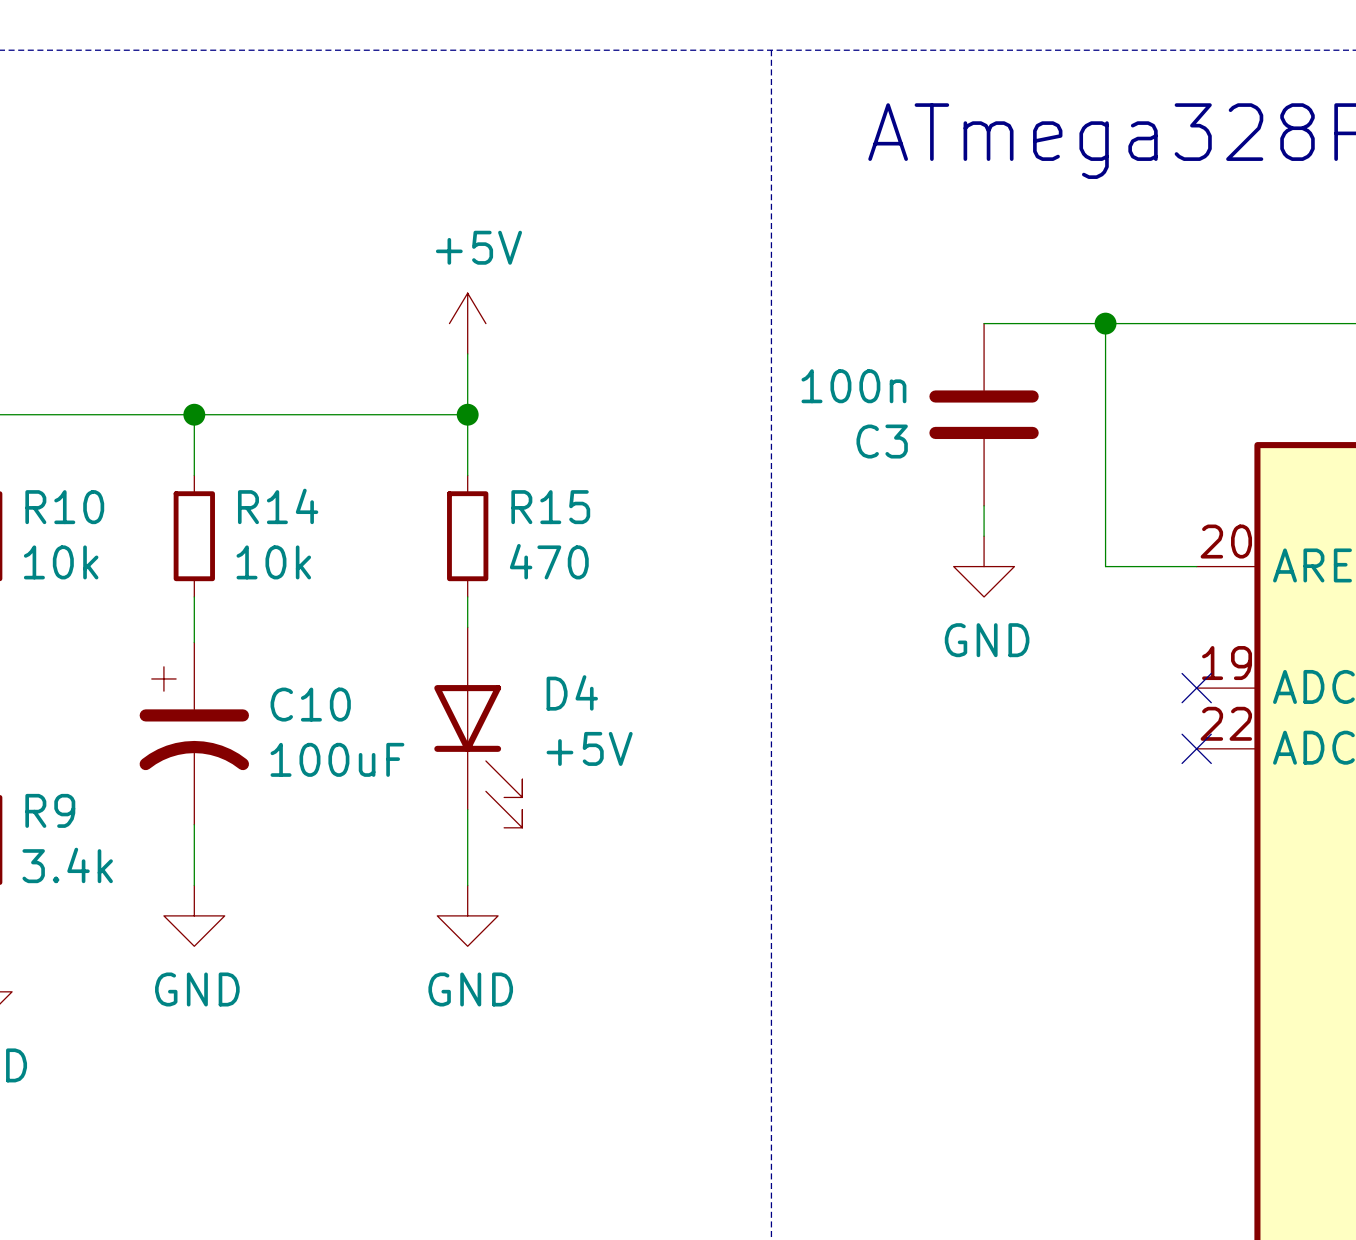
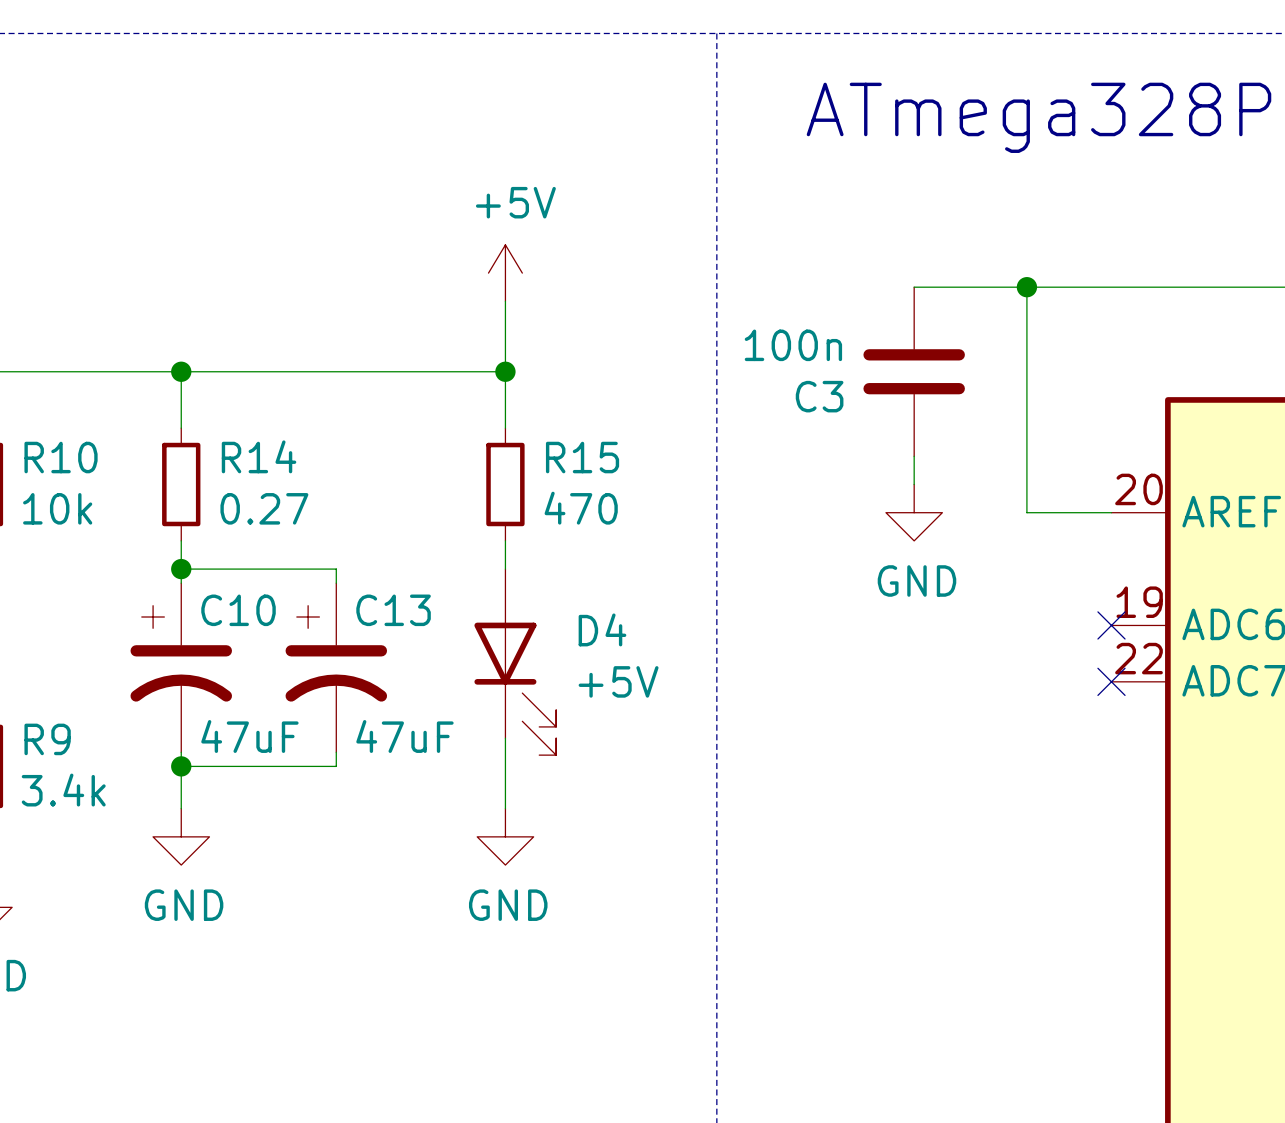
power symbol position: +5V (467, 323) -> +5V (505, 273)
wire: none -> (505, 301) (505, 428)
wire: (467, 353) (467, 475) -> none
wire: none -> (434, 371) (505, 371)
junction position: (467, 414) -> (505, 371)
R15 position: (467, 536) -> (505, 484)
R14 value: 10k (273, 562) -> 0.27 (264, 508)
wire: (467, 596) (467, 627) -> (505, 540) (505, 569)
wire: none -> (181, 569) (336, 569) (336, 583)
junction: none -> (181, 569)
C10 name position: C10 (310, 704) -> C10 (238, 610)
D4 position: (478, 727) -> (515, 662)
C13: none -> 47uF (336, 667)
C10 value: 100uF (337, 759) -> 47uF (249, 736)
wire: (467, 809) (467, 885) -> (505, 738) (505, 808)
wire: none -> (336, 752) (336, 766) (181, 766)
junction: none -> (181, 766)
power symbol position: GND (467, 915) -> GND (505, 836)

